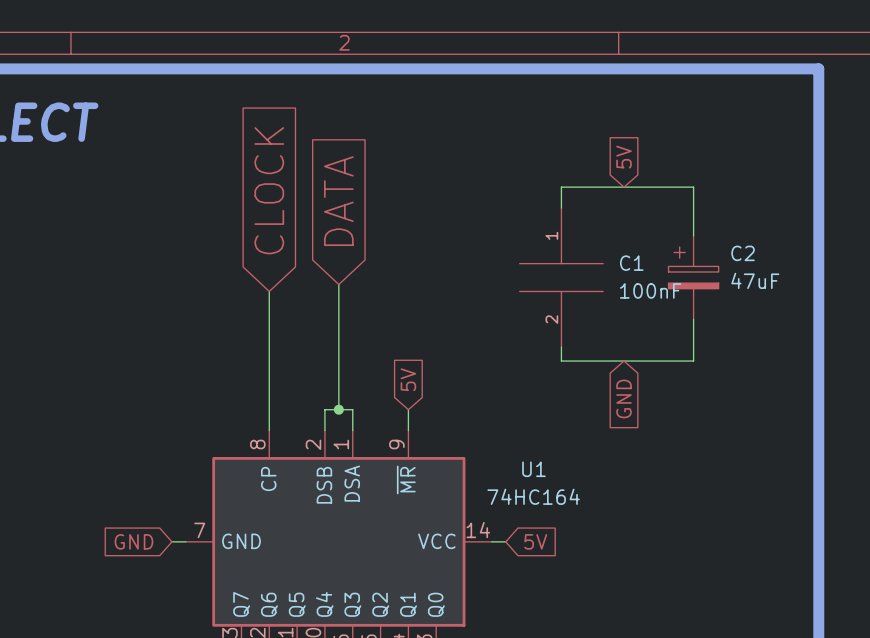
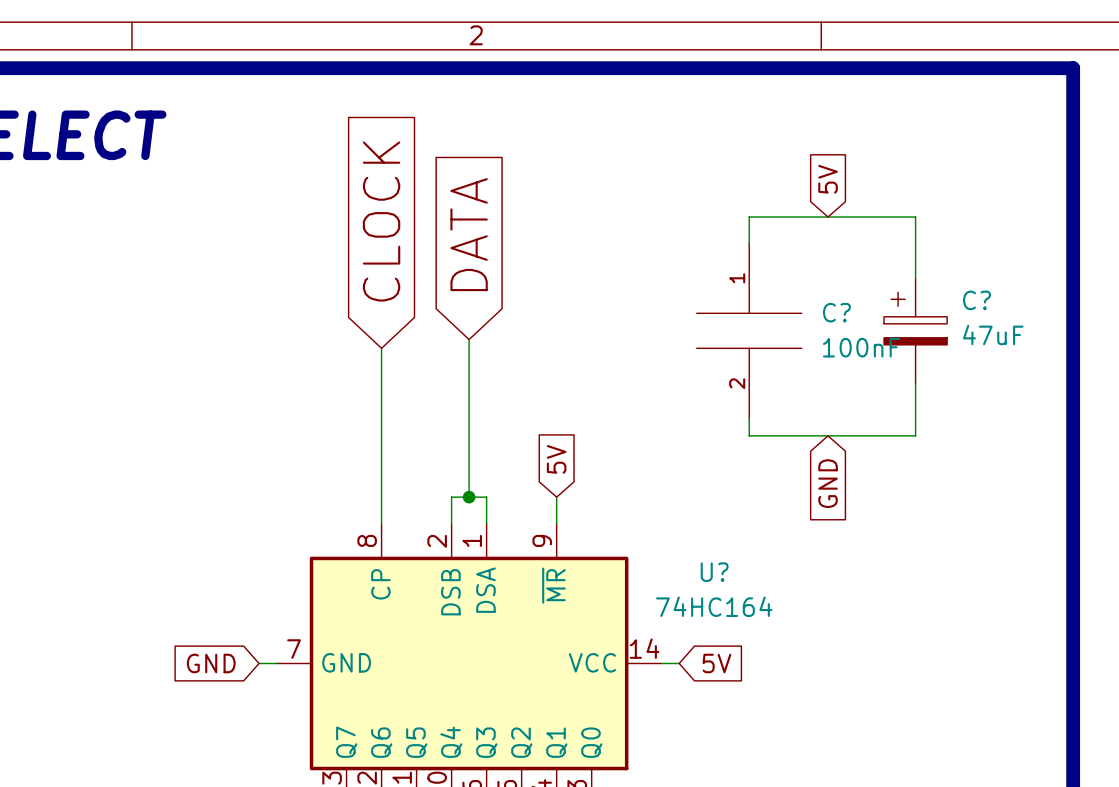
C2 name: C2 (743, 253) -> C? (976, 300)
C1 name: C1 (631, 263) -> C? (836, 312)
U1 name: U1 (533, 469) -> U? (714, 572)

